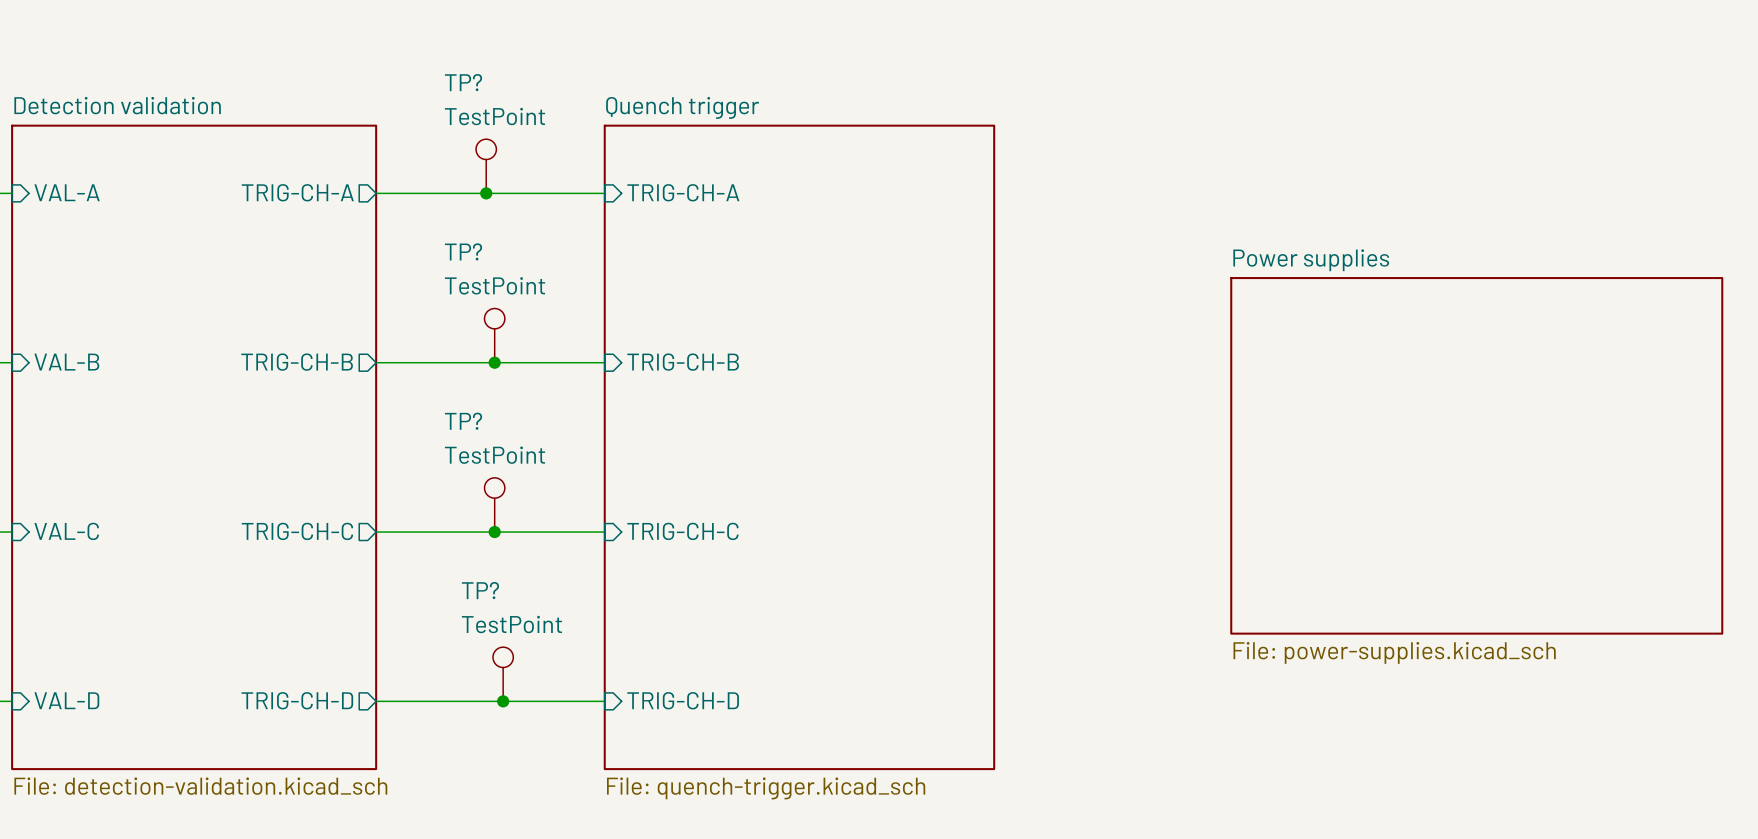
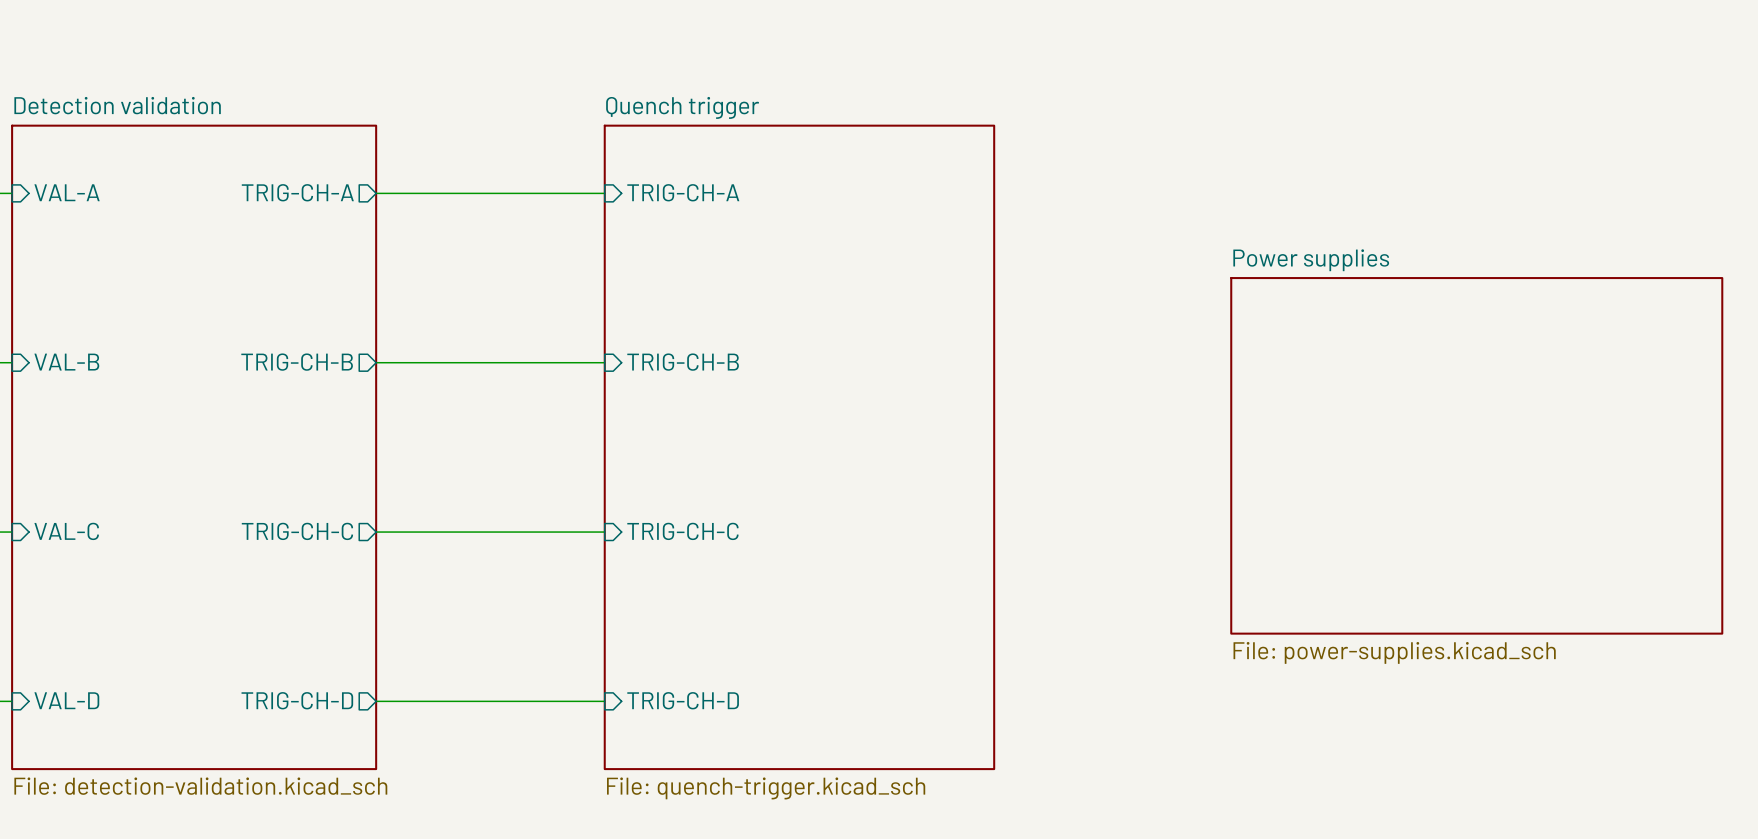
TP?: TestPoint (486, 166) -> none
junction: (486, 193) -> none
TP?: TestPoint (494, 335) -> none
junction: (494, 362) -> none
TP?: TestPoint (494, 504) -> none
junction: (494, 532) -> none
TP?: TestPoint (503, 674) -> none
junction: (503, 701) -> none

